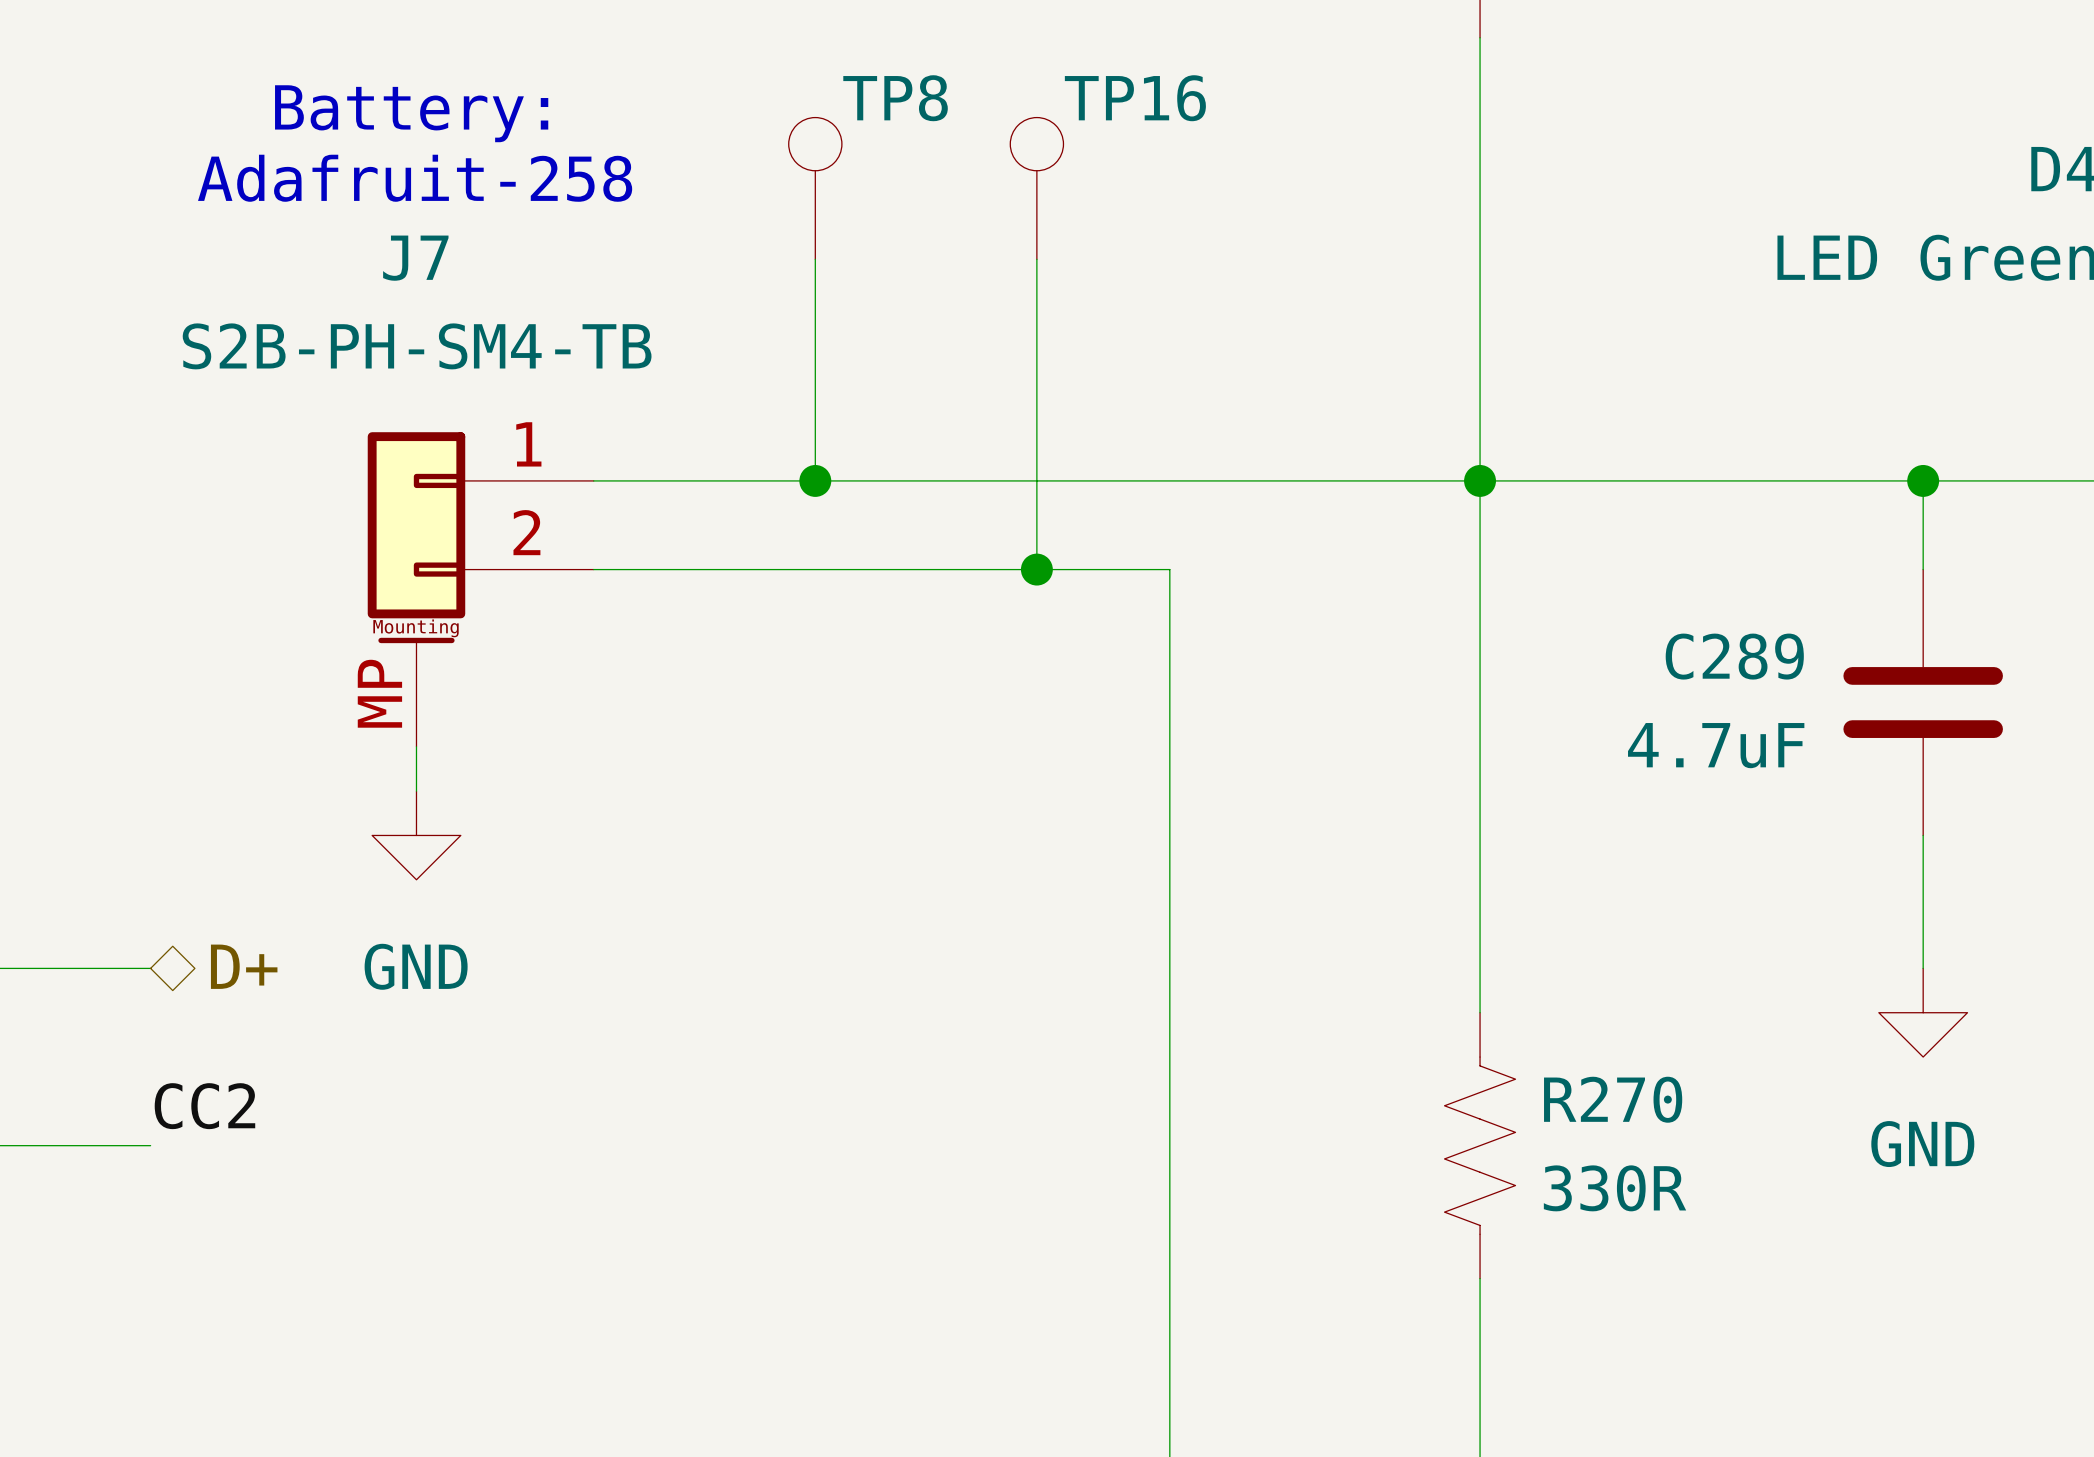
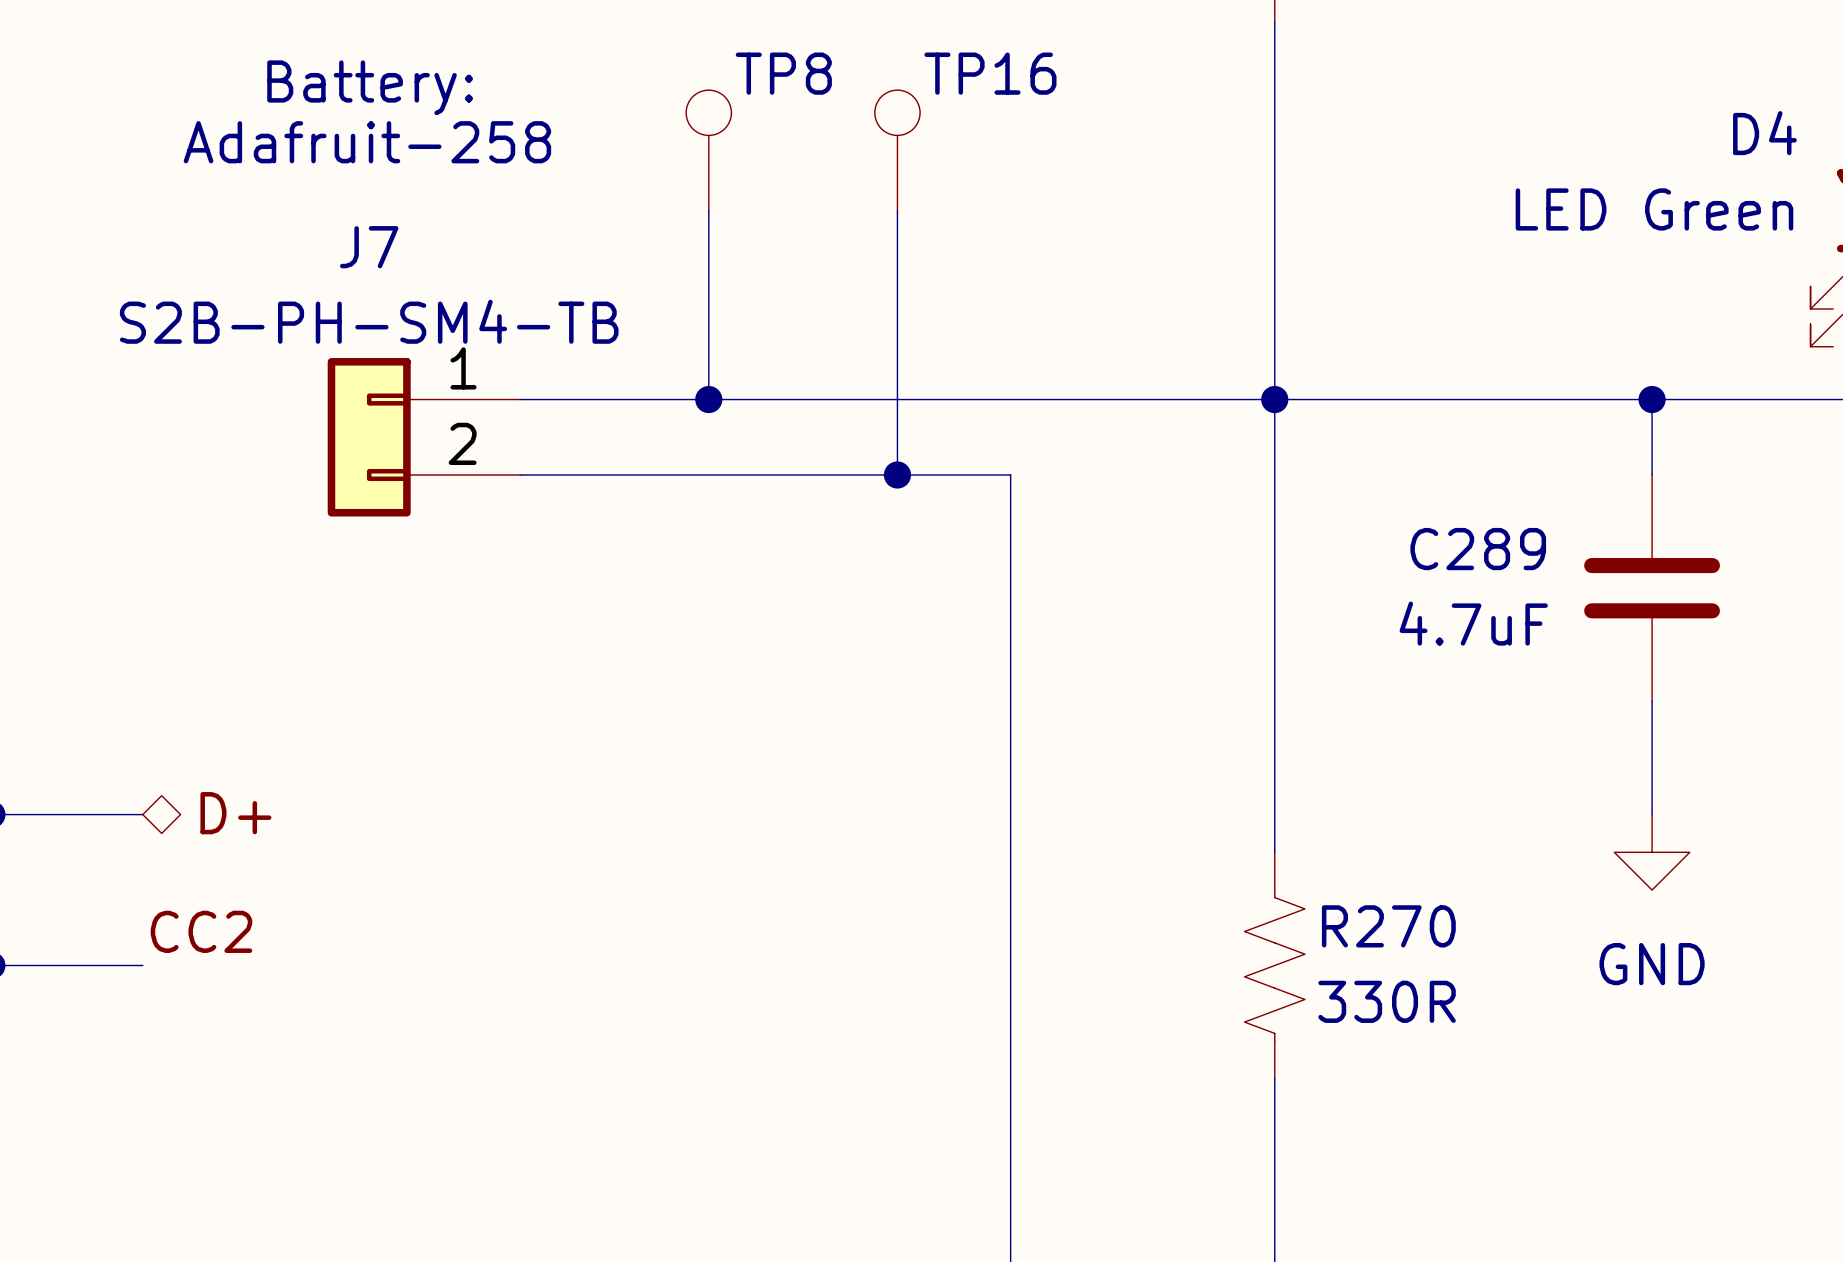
J7 name position: J7 (415, 258) -> J7 (369, 247)
J7 value position: S2B-PH-SM4-TB (417, 346) -> S2B-PH-SM4-TB (369, 321)
J7 symbol: [367, 432, 594, 747] -> [327, 358, 521, 517]
wire: (416, 746) (416, 791) -> none
power symbol: GND (416, 835) -> none

